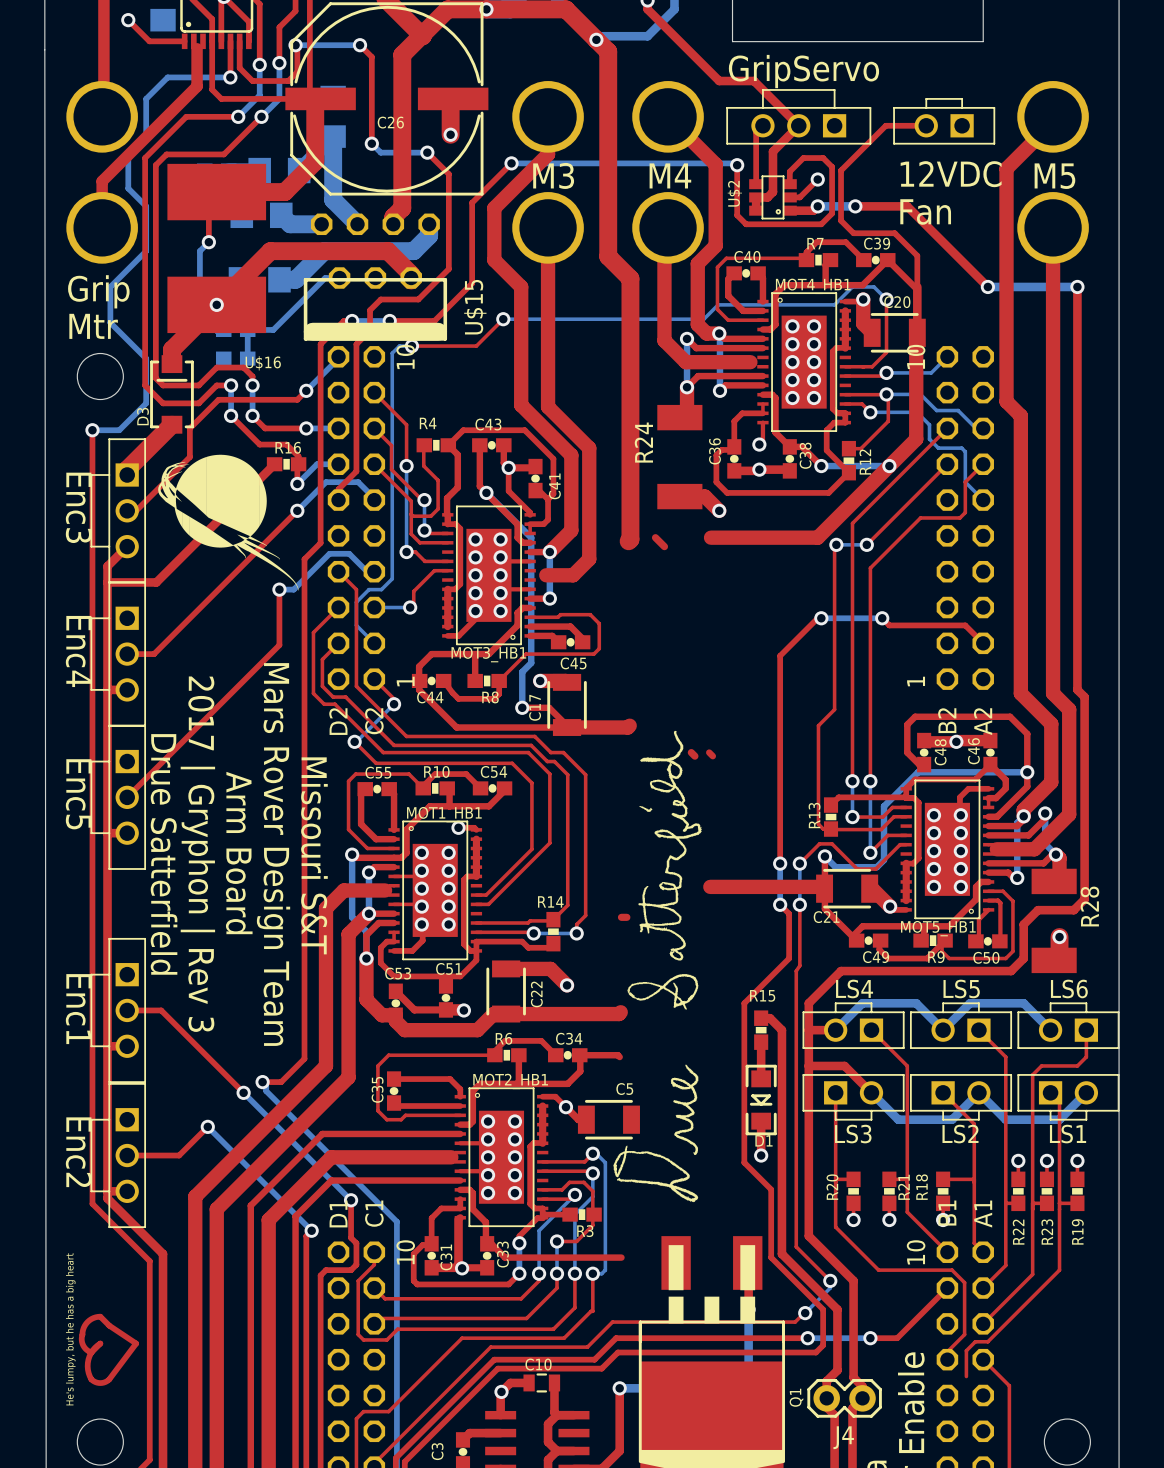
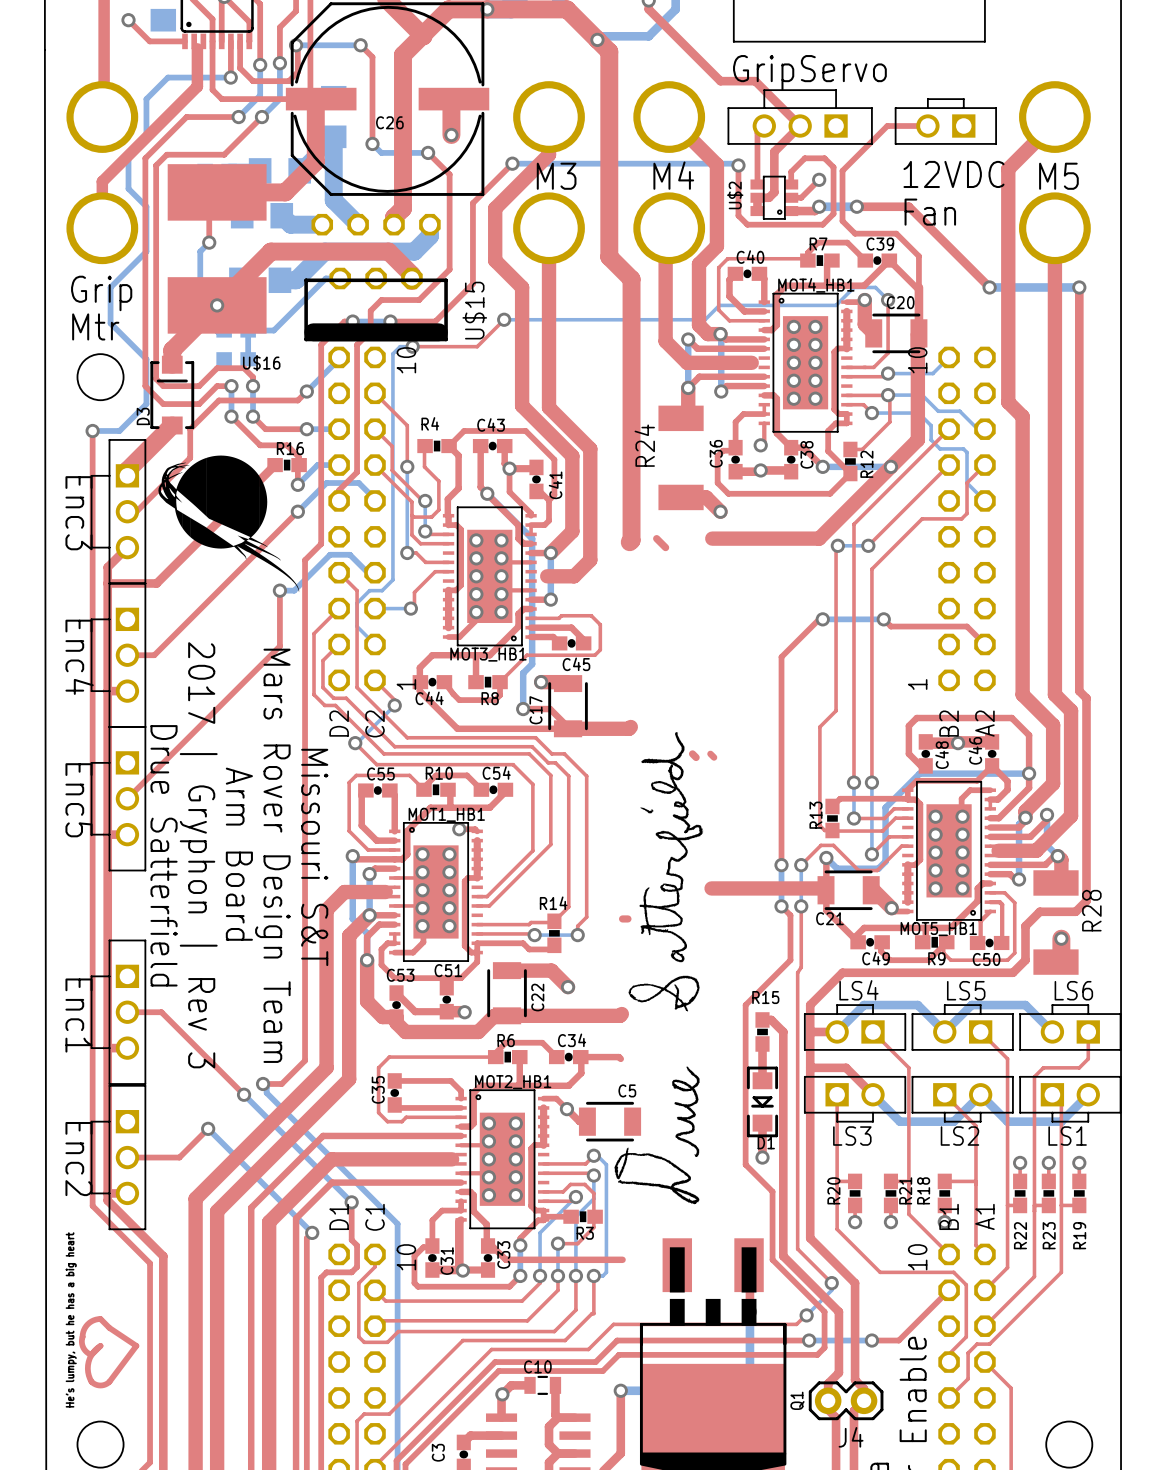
top track: none -> (968, 1378) (949, 1397)

